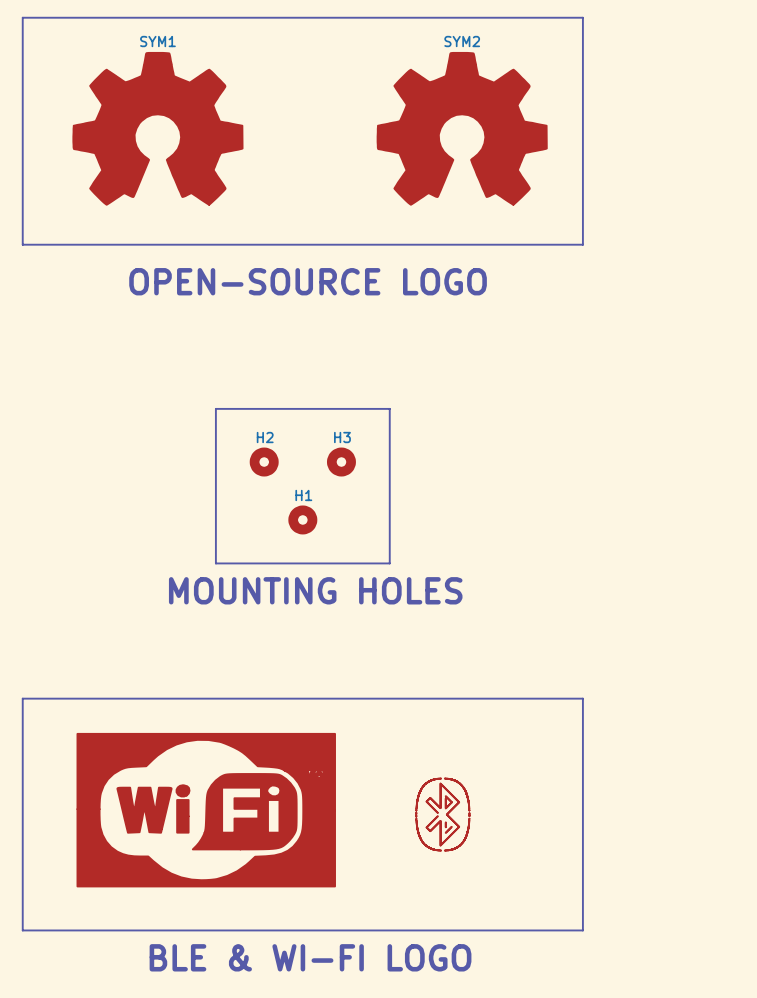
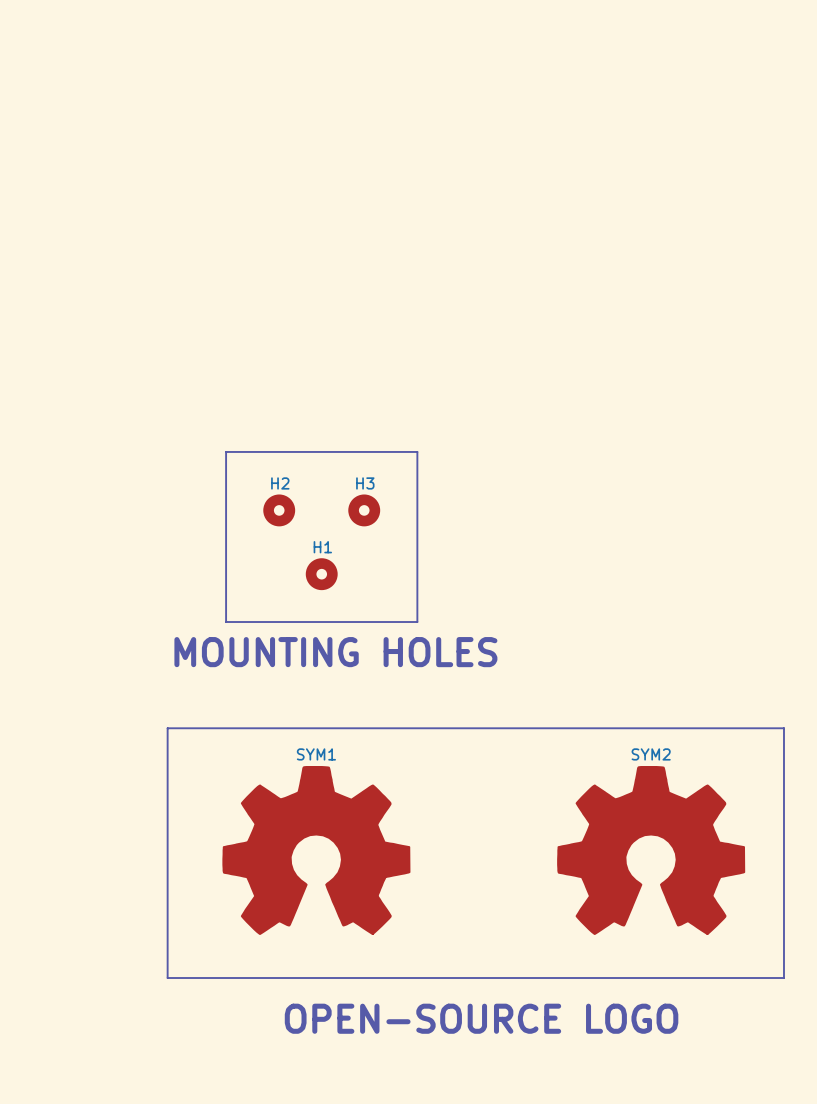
bus: (22, 17) (582, 17) (582, 244) (22, 244) (22, 17) -> none
SYM1 position: (157, 128) -> (316, 850)
SYM2 position: (462, 128) -> (651, 850)
text: OPEN-SOURCE LOGO (308, 281) -> none
bus: none -> (167, 728) (783, 728) (783, 978) (167, 978) (167, 728)
bus: (22, 698) (22, 930) (582, 930) (582, 698) (22, 698) -> none
power symbol: (206, 810) -> none
power symbol: (442, 814) -> none
text: none -> OPEN-SOURCE LOGO (481, 1018)
text: BLE & WI-FI LOGO (310, 957) -> none

